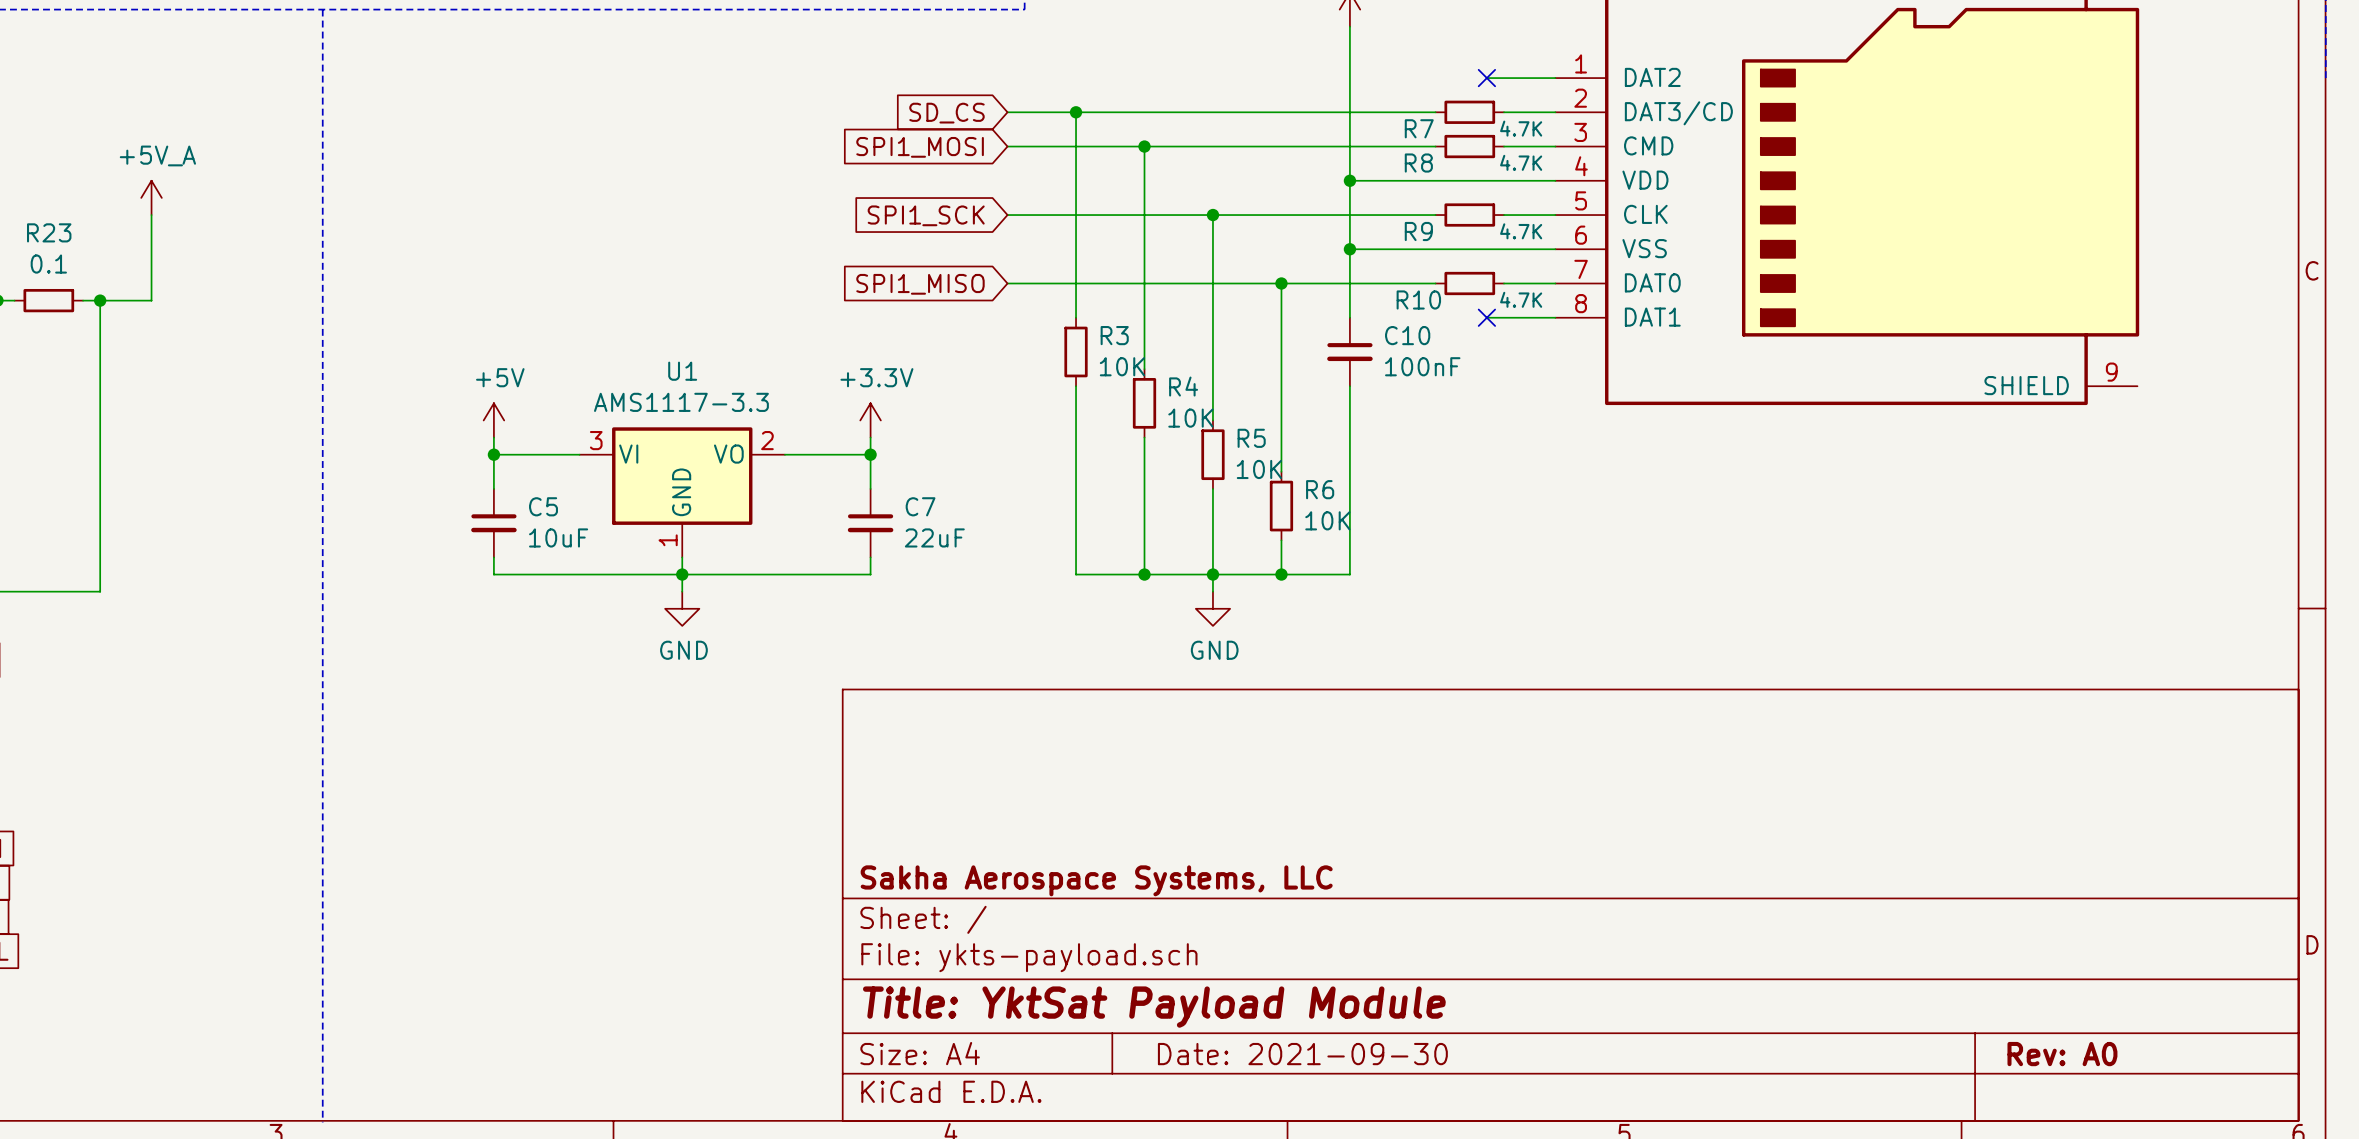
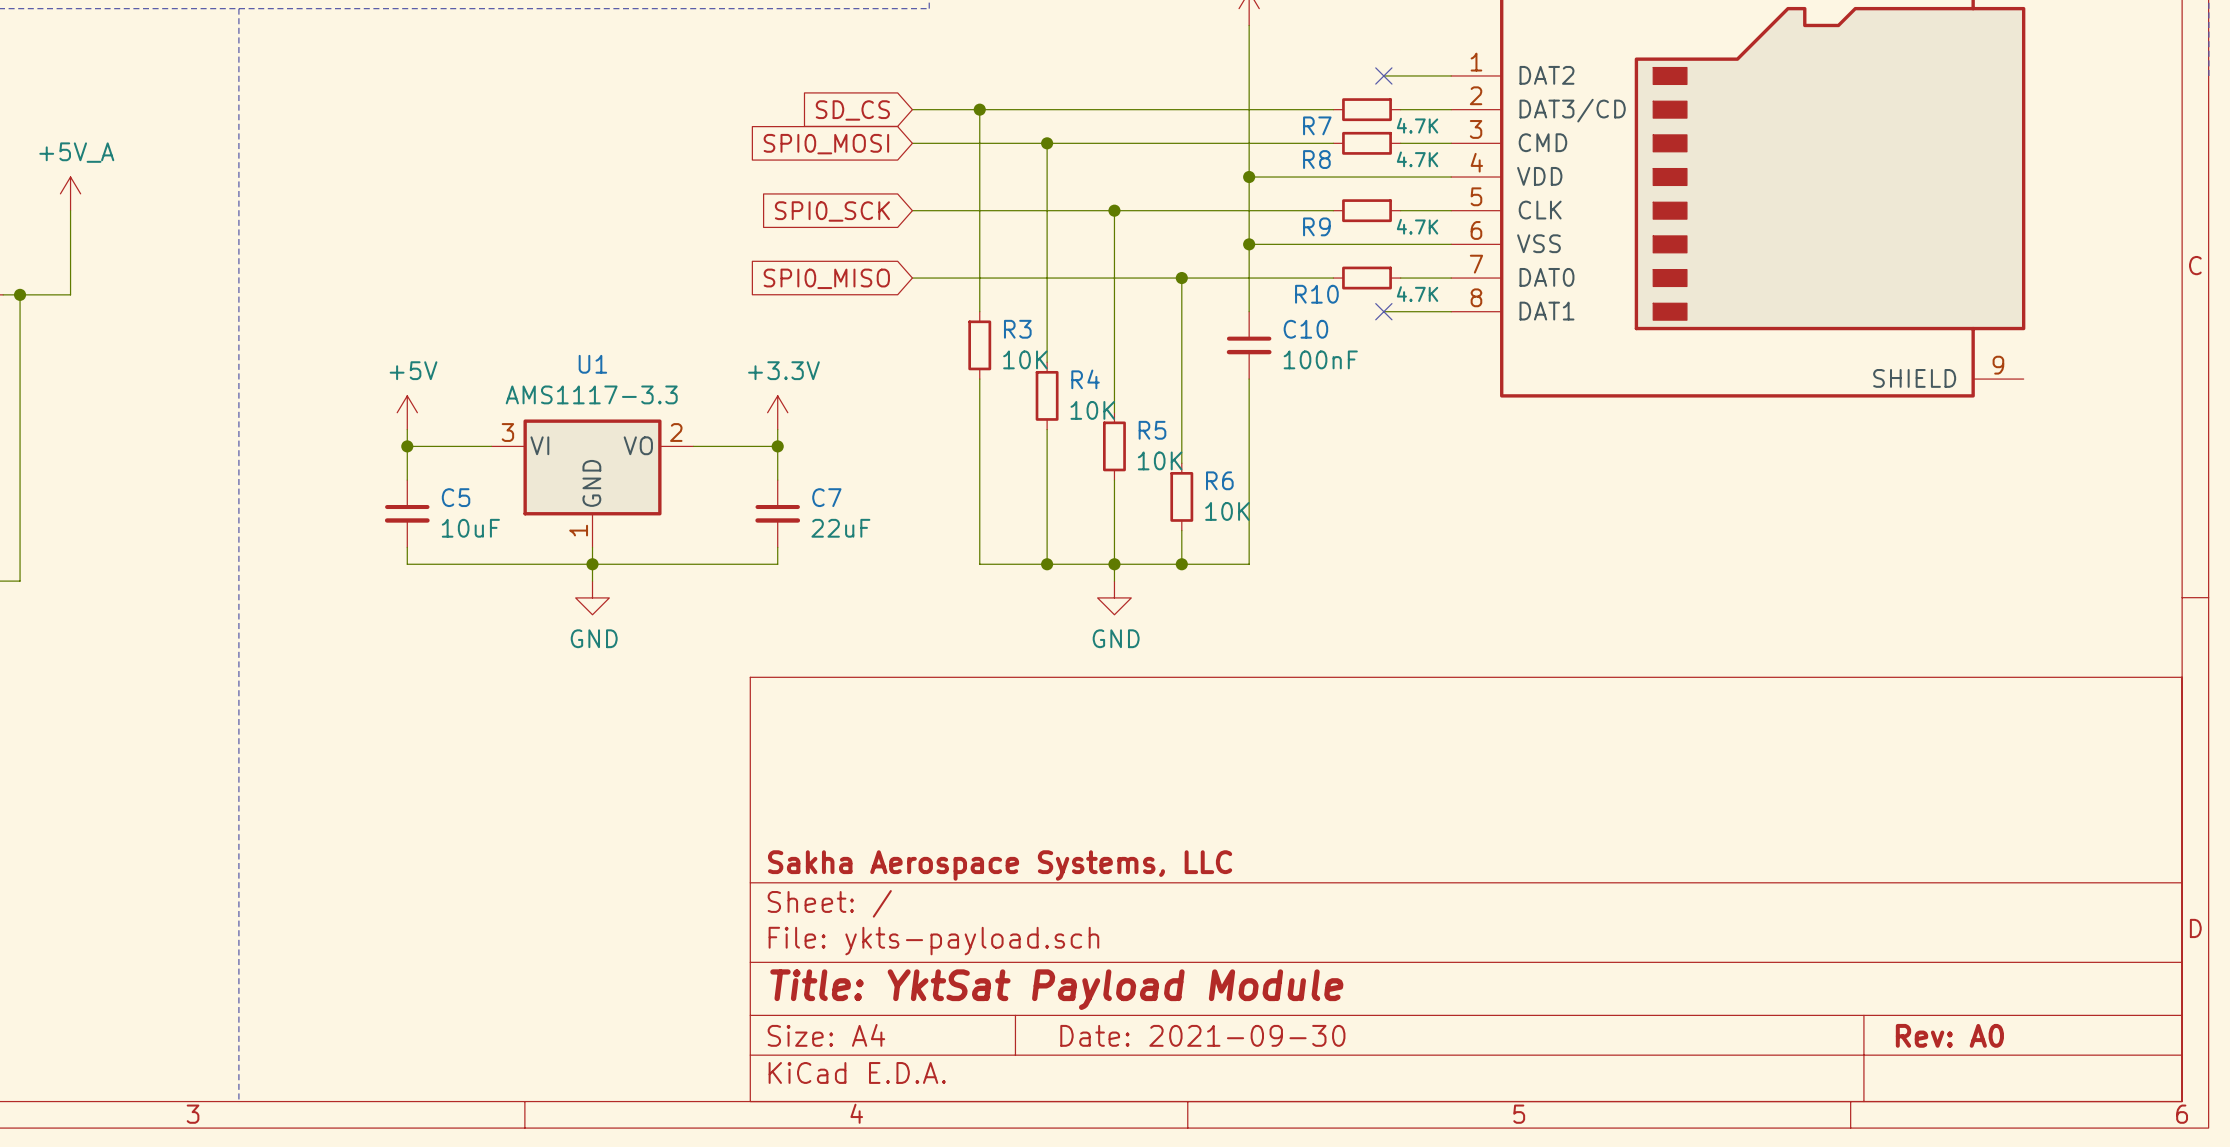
global label: SPI1_MOSI (920, 147) -> SPI0_MOSI (826, 144)
global label: SPI1_SCK (926, 215) -> SPI0_SCK (832, 211)
global label: SPI1_MISO (920, 284) -> SPI0_MISO (826, 278)

